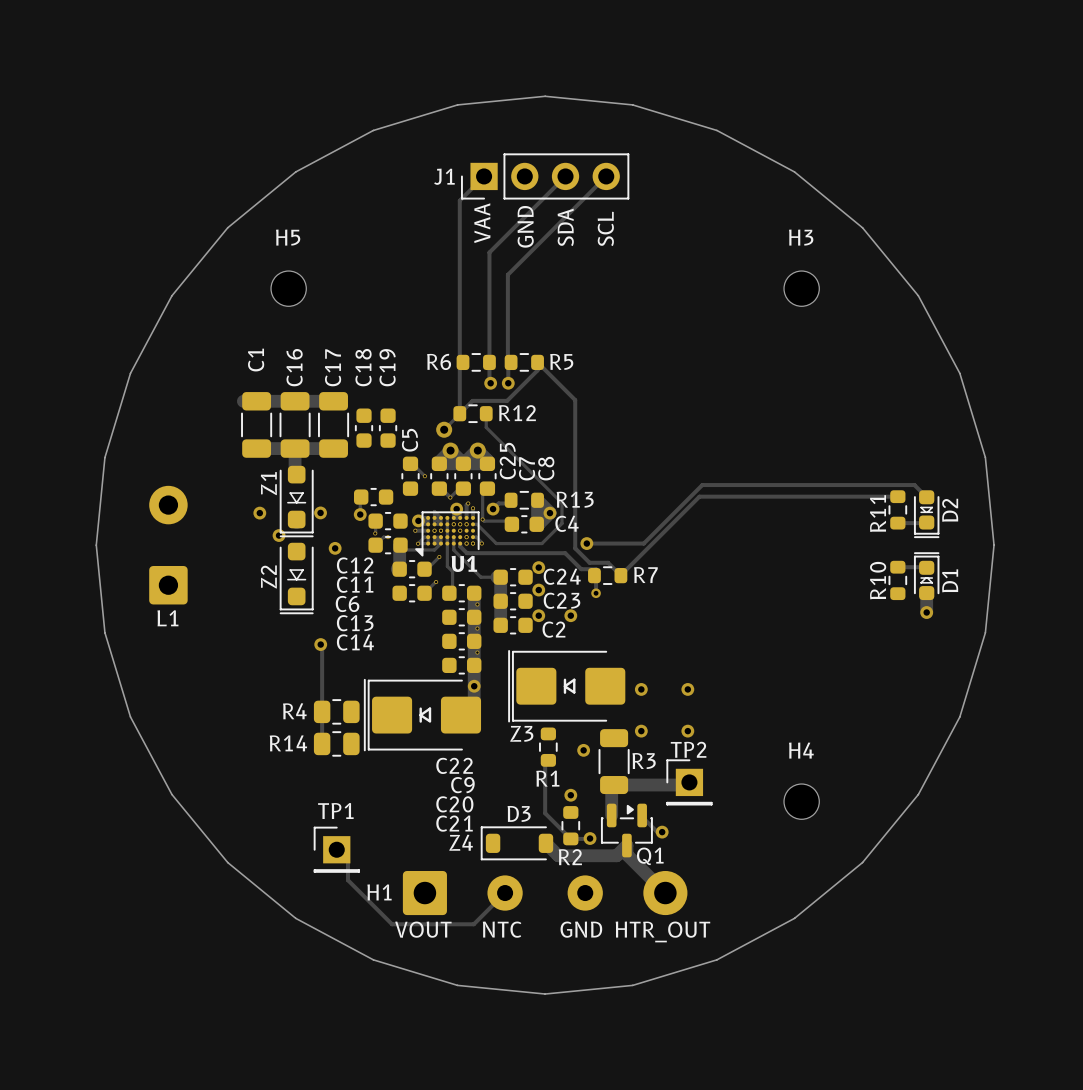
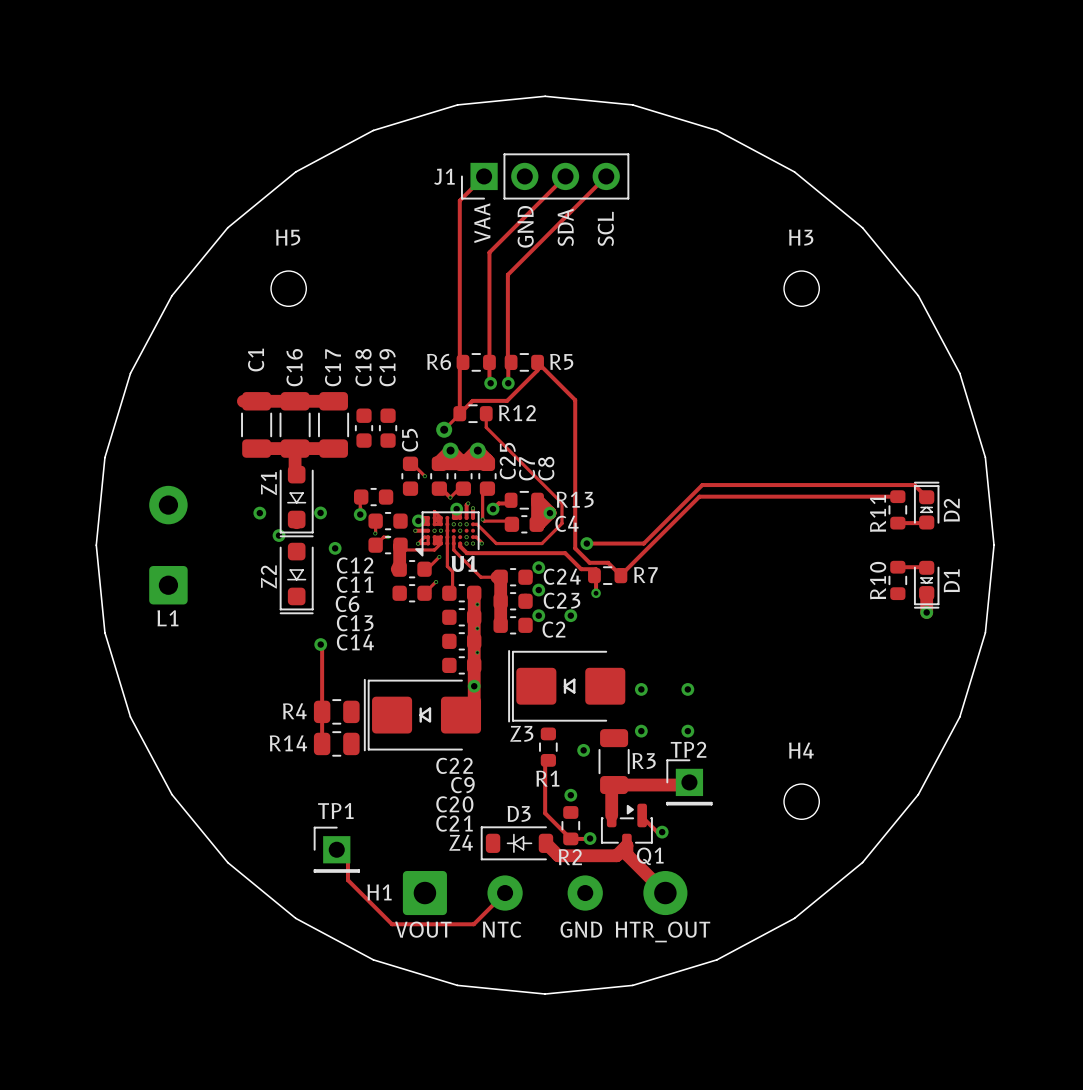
D2 rotation: 0° (926, 514) -> 180° (926, 505)
D1 rotation: 0° (926, 576) -> 180° (926, 584)
D3 footprint: [480, 826, 554, 861] -> [480, 826, 554, 861]

